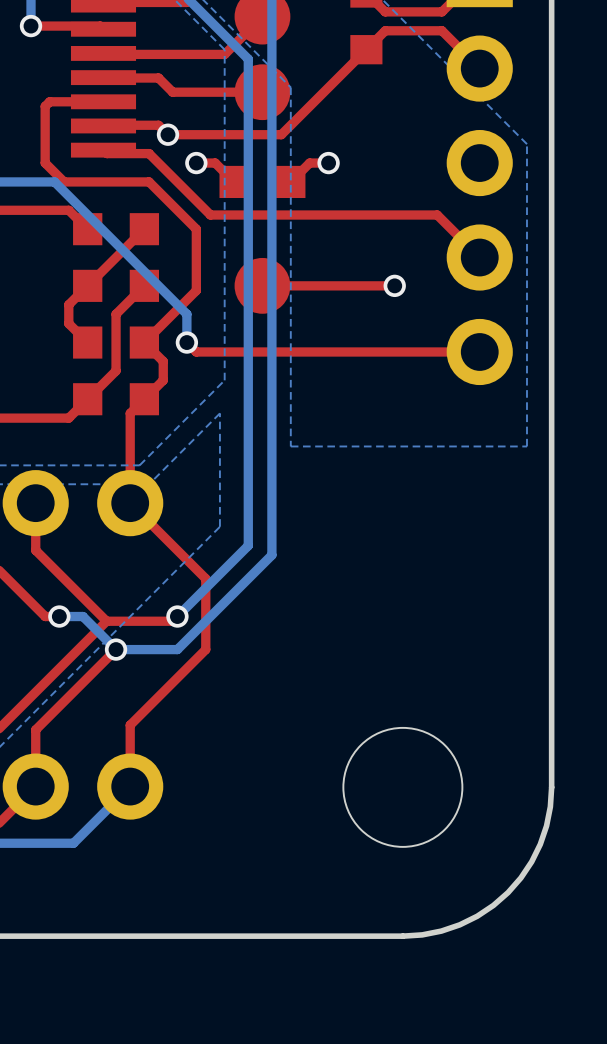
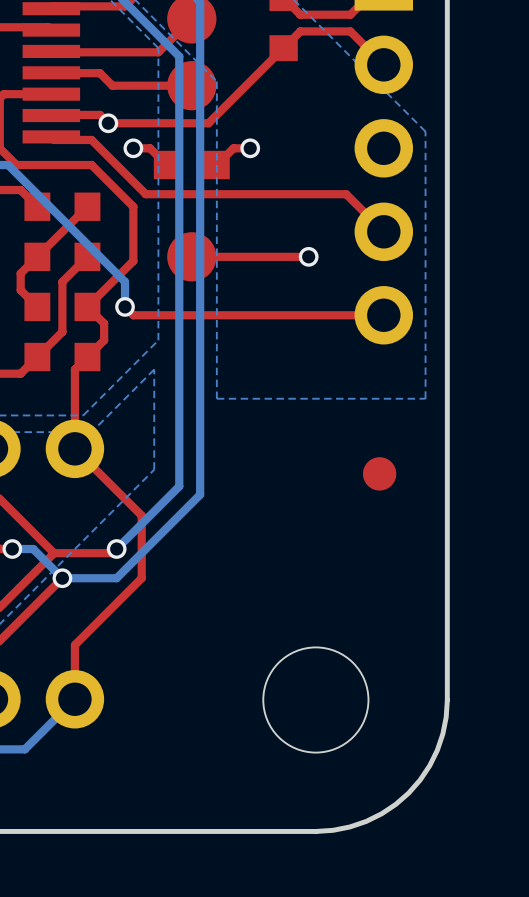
part: none -> (379, 473)

